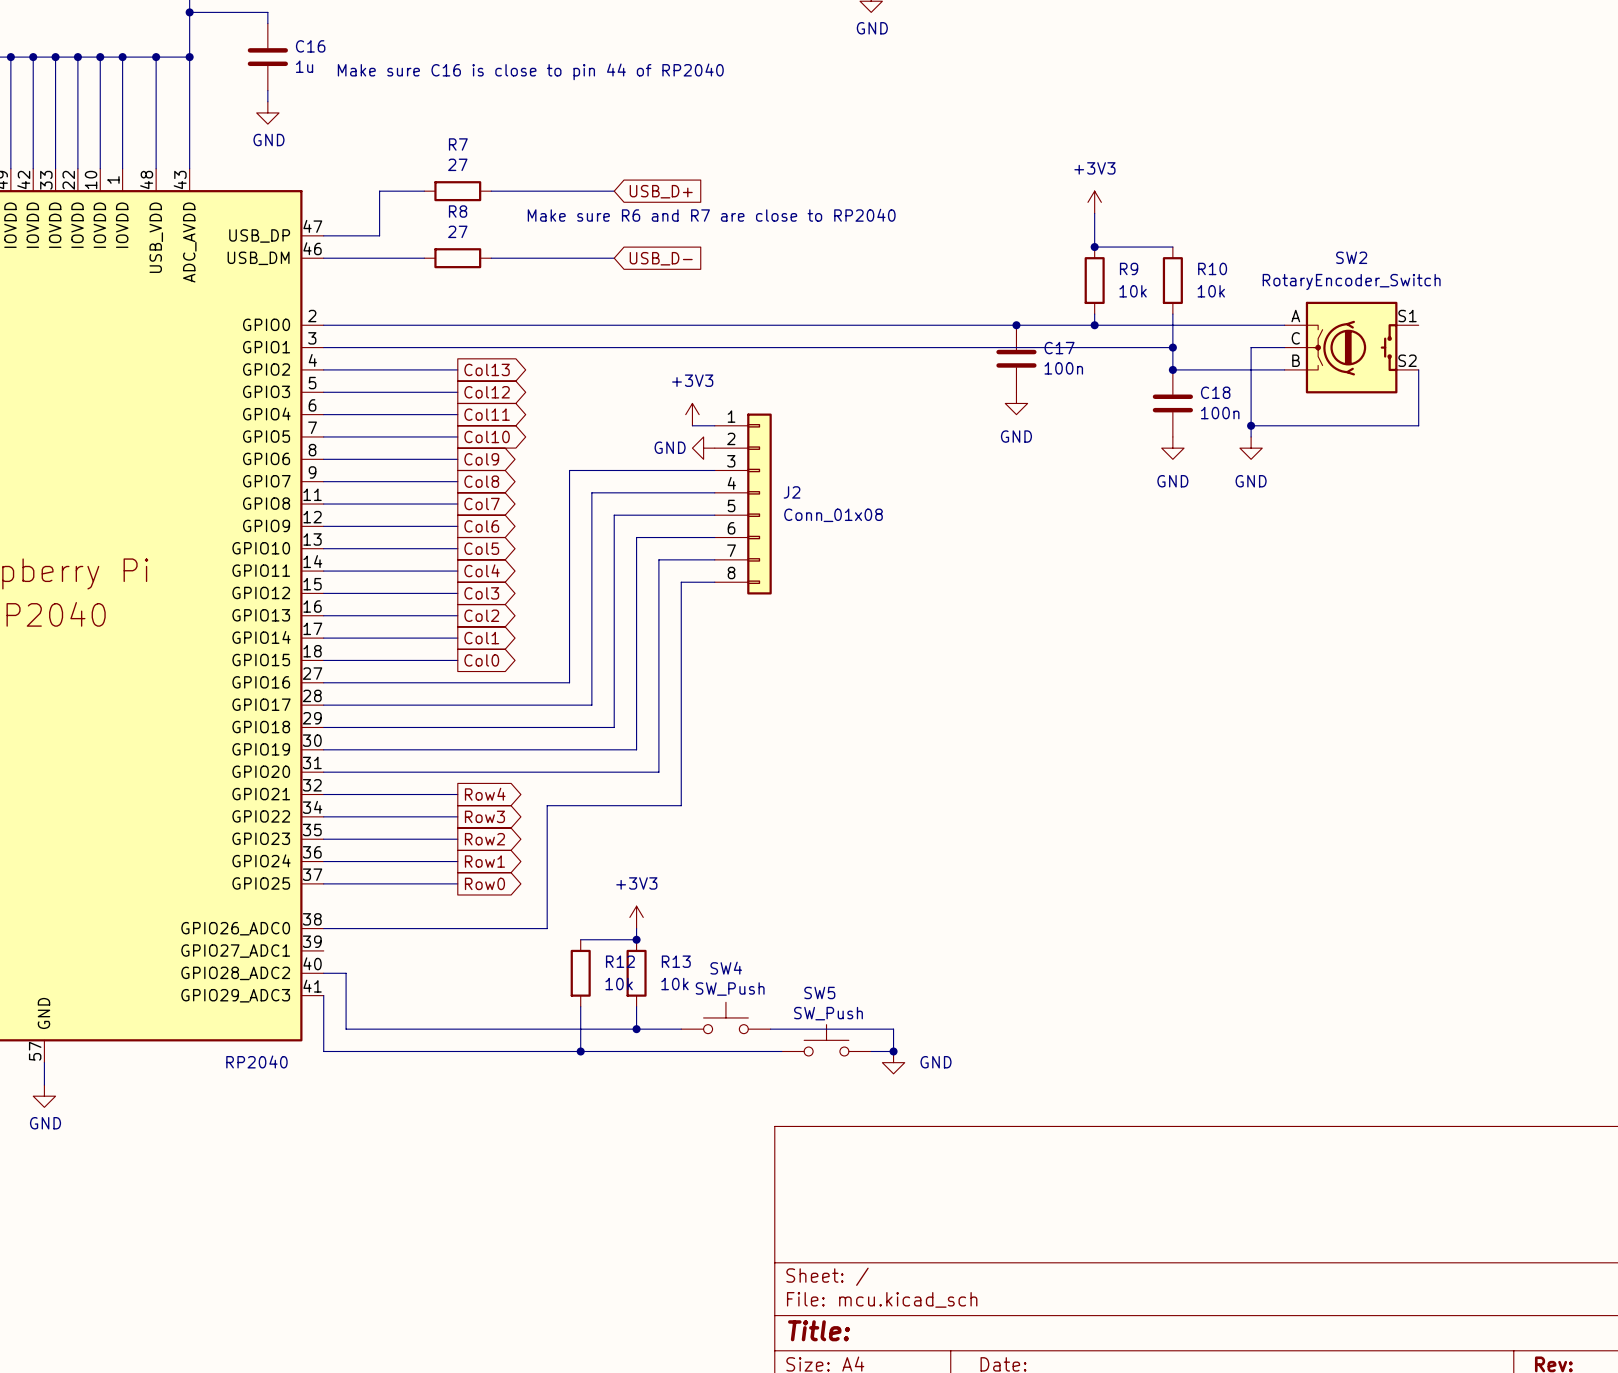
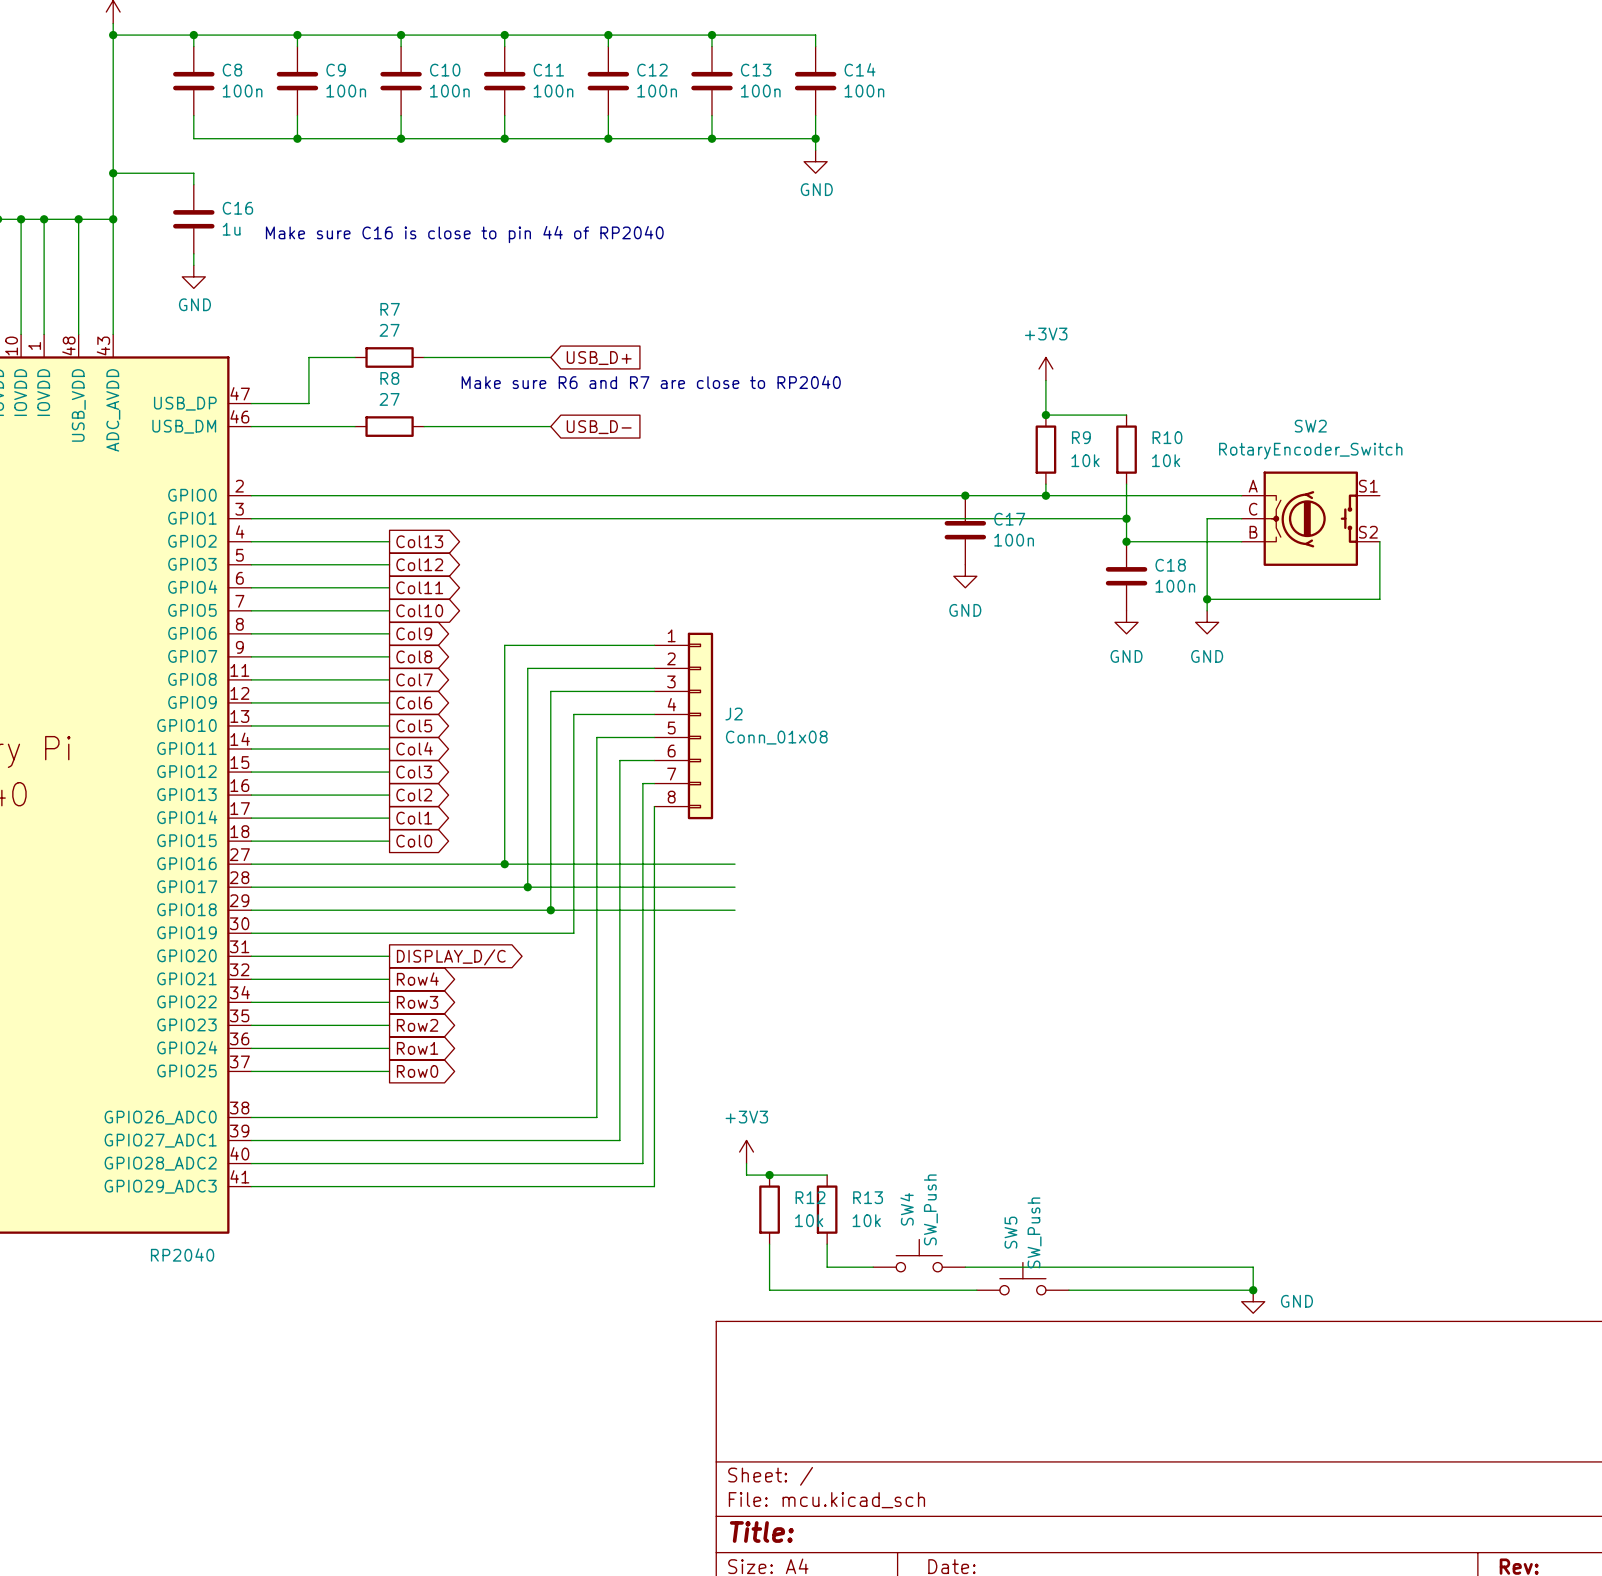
power symbol: +3V3 (692, 414) -> none
wire: (692, 425) (714, 425) -> none
power symbol: GND (703, 448) -> none
J2 position: (743, 504) -> (683, 725)
wire: none -> (504, 864) (735, 864)
junction: none -> (504, 864)
junction: none -> (527, 887)
wire: none -> (550, 910) (735, 910)
junction: none -> (550, 910)
wire: (457, 772) (658, 772) -> (527, 887) (735, 887)
global label: none -> DISPLAY_D/C (451, 957)
wire: (681, 805) (547, 805) (547, 928) -> (596, 956) (596, 1117) (481, 1117)
wire: none -> (619, 990) (619, 1140) (251, 1140)
power symbol position: +3V3 (636, 917) -> +3V3 (746, 1152)
wire: (636, 928) (636, 939) (580, 939) -> none
junction: (636, 939) -> none
SW4 name rotation: 0° (726, 968) -> 90° counterclockwise (907, 1209)
wire: (346, 973) (346, 1029) (681, 1029) -> (274, 1163) (642, 1163) (642, 783) (654, 783)
R12 position: (580, 973) -> (769, 1209)
R13 position: (636, 973) -> (827, 1209)
wire: none -> (746, 1163) (746, 1175) (827, 1175)
junction: none -> (769, 1175)
SW4 value rotation: 0° (730, 989) -> 90° counterclockwise (930, 1209)
SW5 name rotation: 0° (819, 992) -> 90° counterclockwise (1010, 1232)
wire: (323, 995) (323, 1051) (781, 1051) -> (251, 1186) (654, 1186) (654, 806)
wire: (580, 1006) (580, 1051) -> none
wire: (636, 1006) (636, 1029) -> none
SW5 value rotation: 0° (828, 1013) -> 90° counterclockwise (1034, 1232)
SW4 position: (725, 1017) -> (919, 1255)
junction: (636, 1029) -> none
wire: (770, 1029) (893, 1029) (893, 1051) (871, 1051) -> none
SW5 position: (826, 1040) -> (1022, 1278)
junction: (580, 1051) -> none
wire: none -> (769, 1244) (769, 1290) (976, 1290)
wire: none -> (827, 1244) (827, 1267) (873, 1267)
junction: (893, 1051) -> none
power symbol: GND (893, 1062) -> none
wire: none -> (965, 1267) (1253, 1267) (1253, 1290) (1068, 1290)
junction: none -> (1253, 1290)
power symbol: none -> GND (1253, 1301)

